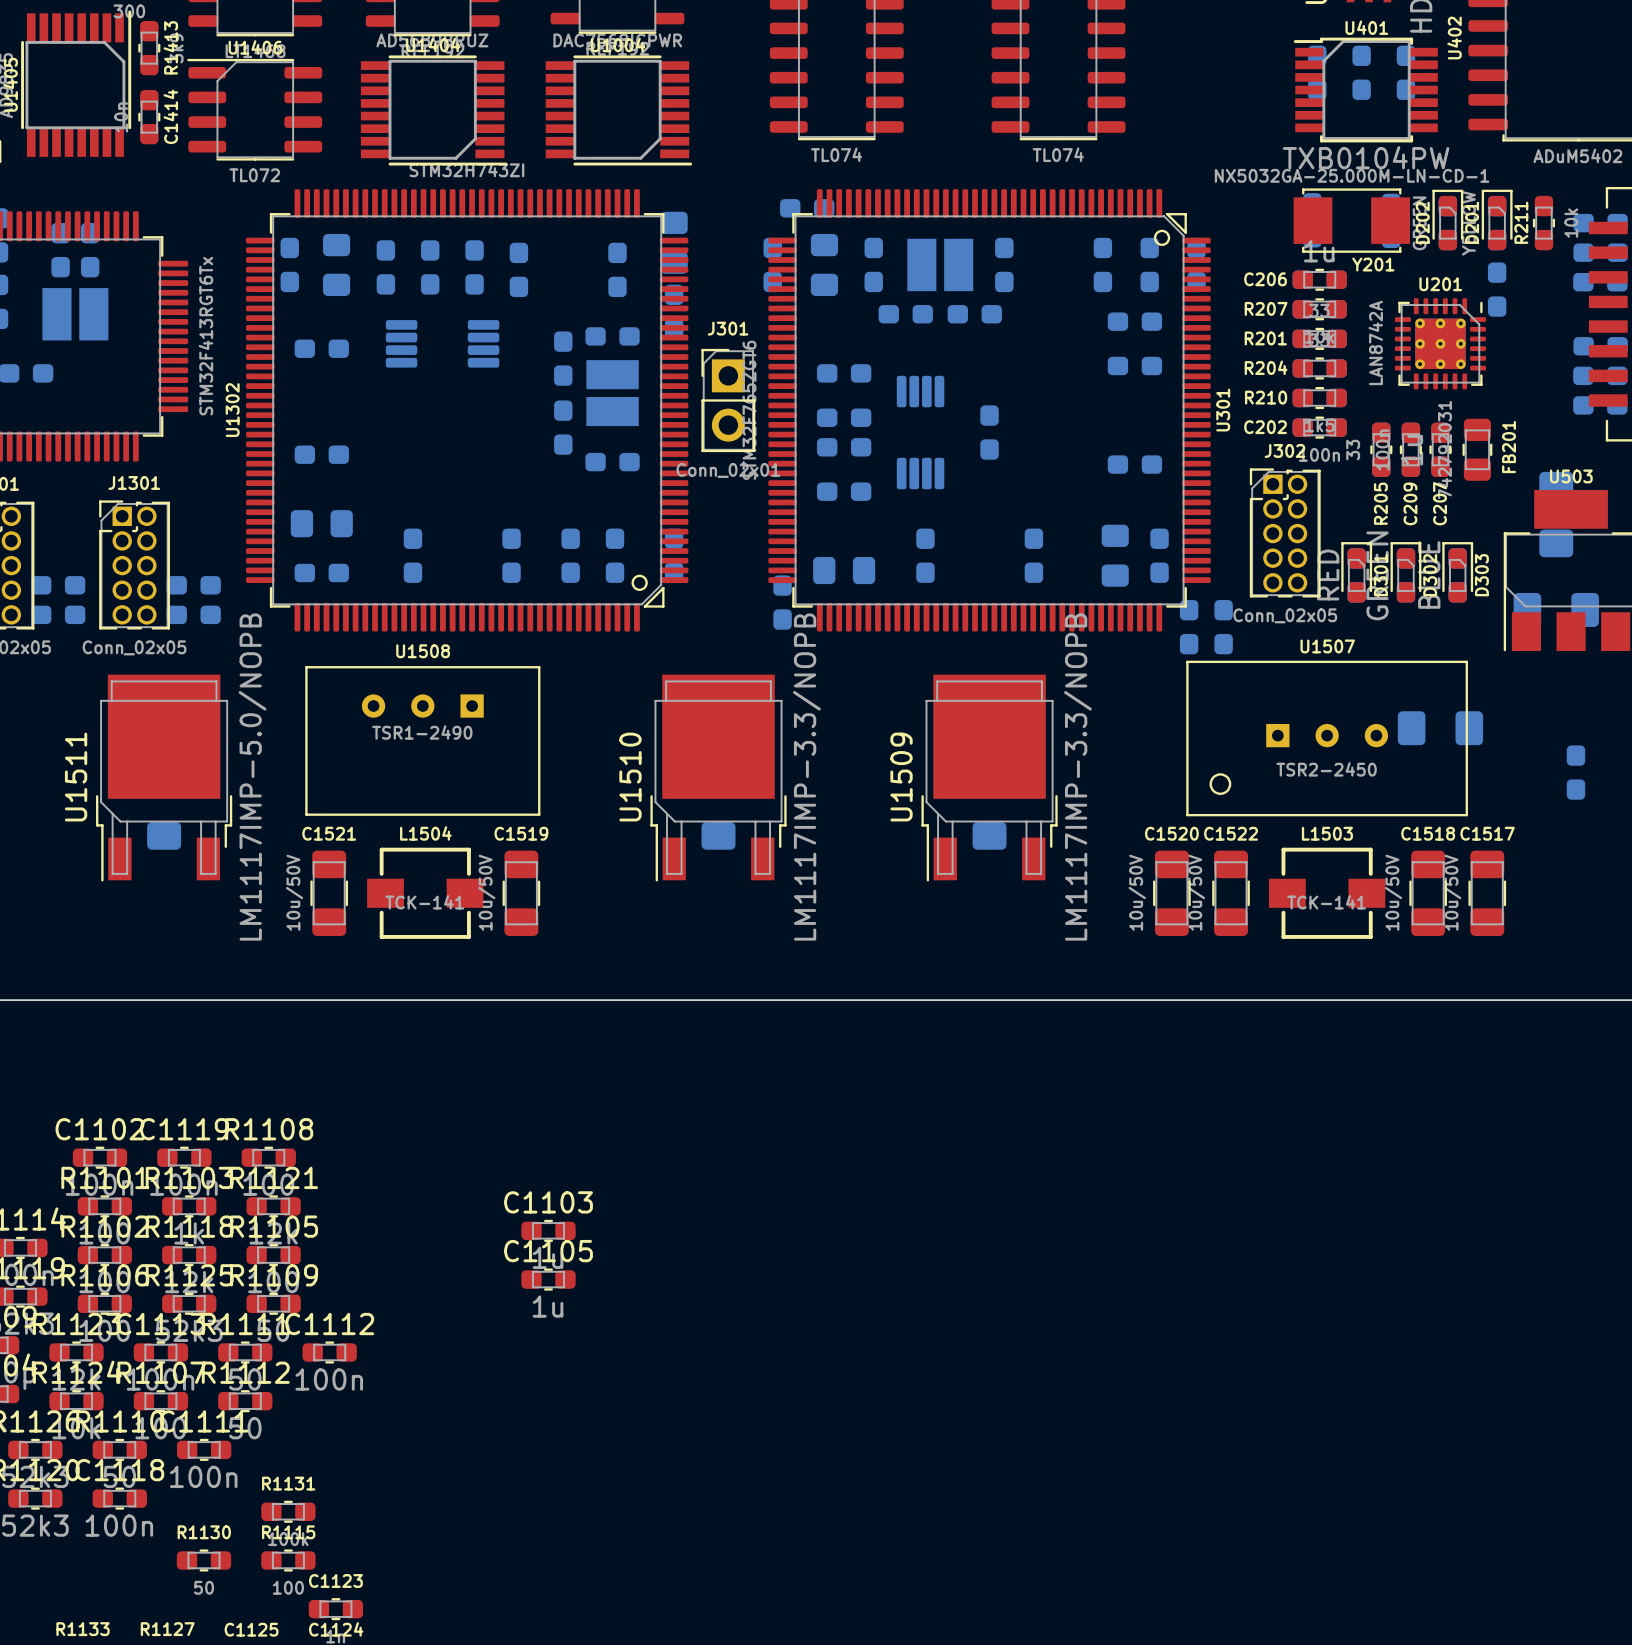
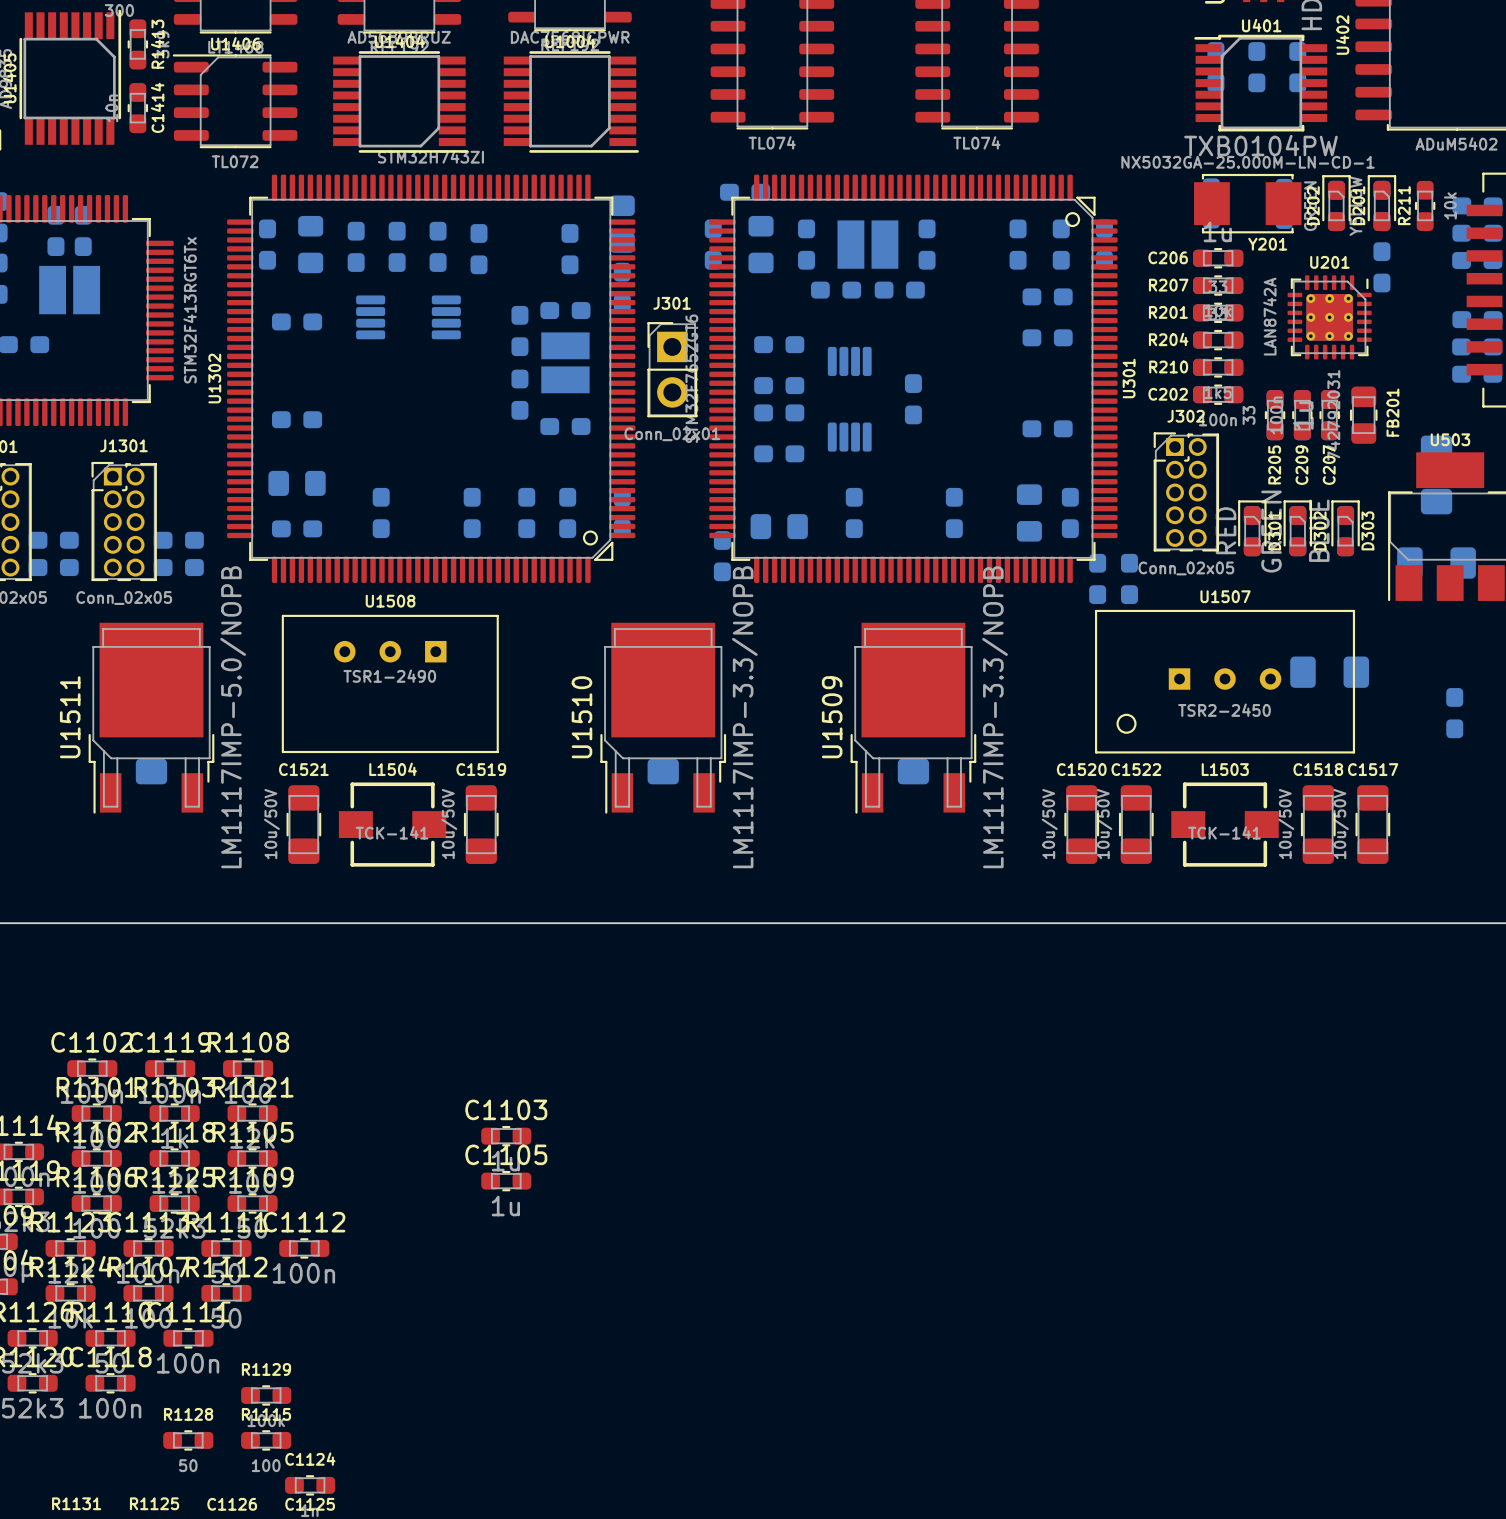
R1131 name: R1131 (288, 1483) -> R1129 (266, 1369)
R1130 name: R1130 (204, 1532) -> R1128 (188, 1414)
C1123 name: C1123 (335, 1580) -> C1124 (310, 1459)
R1133 name: R1133 (83, 1629) -> R1131 (76, 1503)
R1127 name: R1127 (167, 1629) -> R1125 (154, 1503)
C1125 name: C1125 (251, 1629) -> C1126 (232, 1504)
C1124 name: C1124 (336, 1629) -> C1125 (310, 1504)

